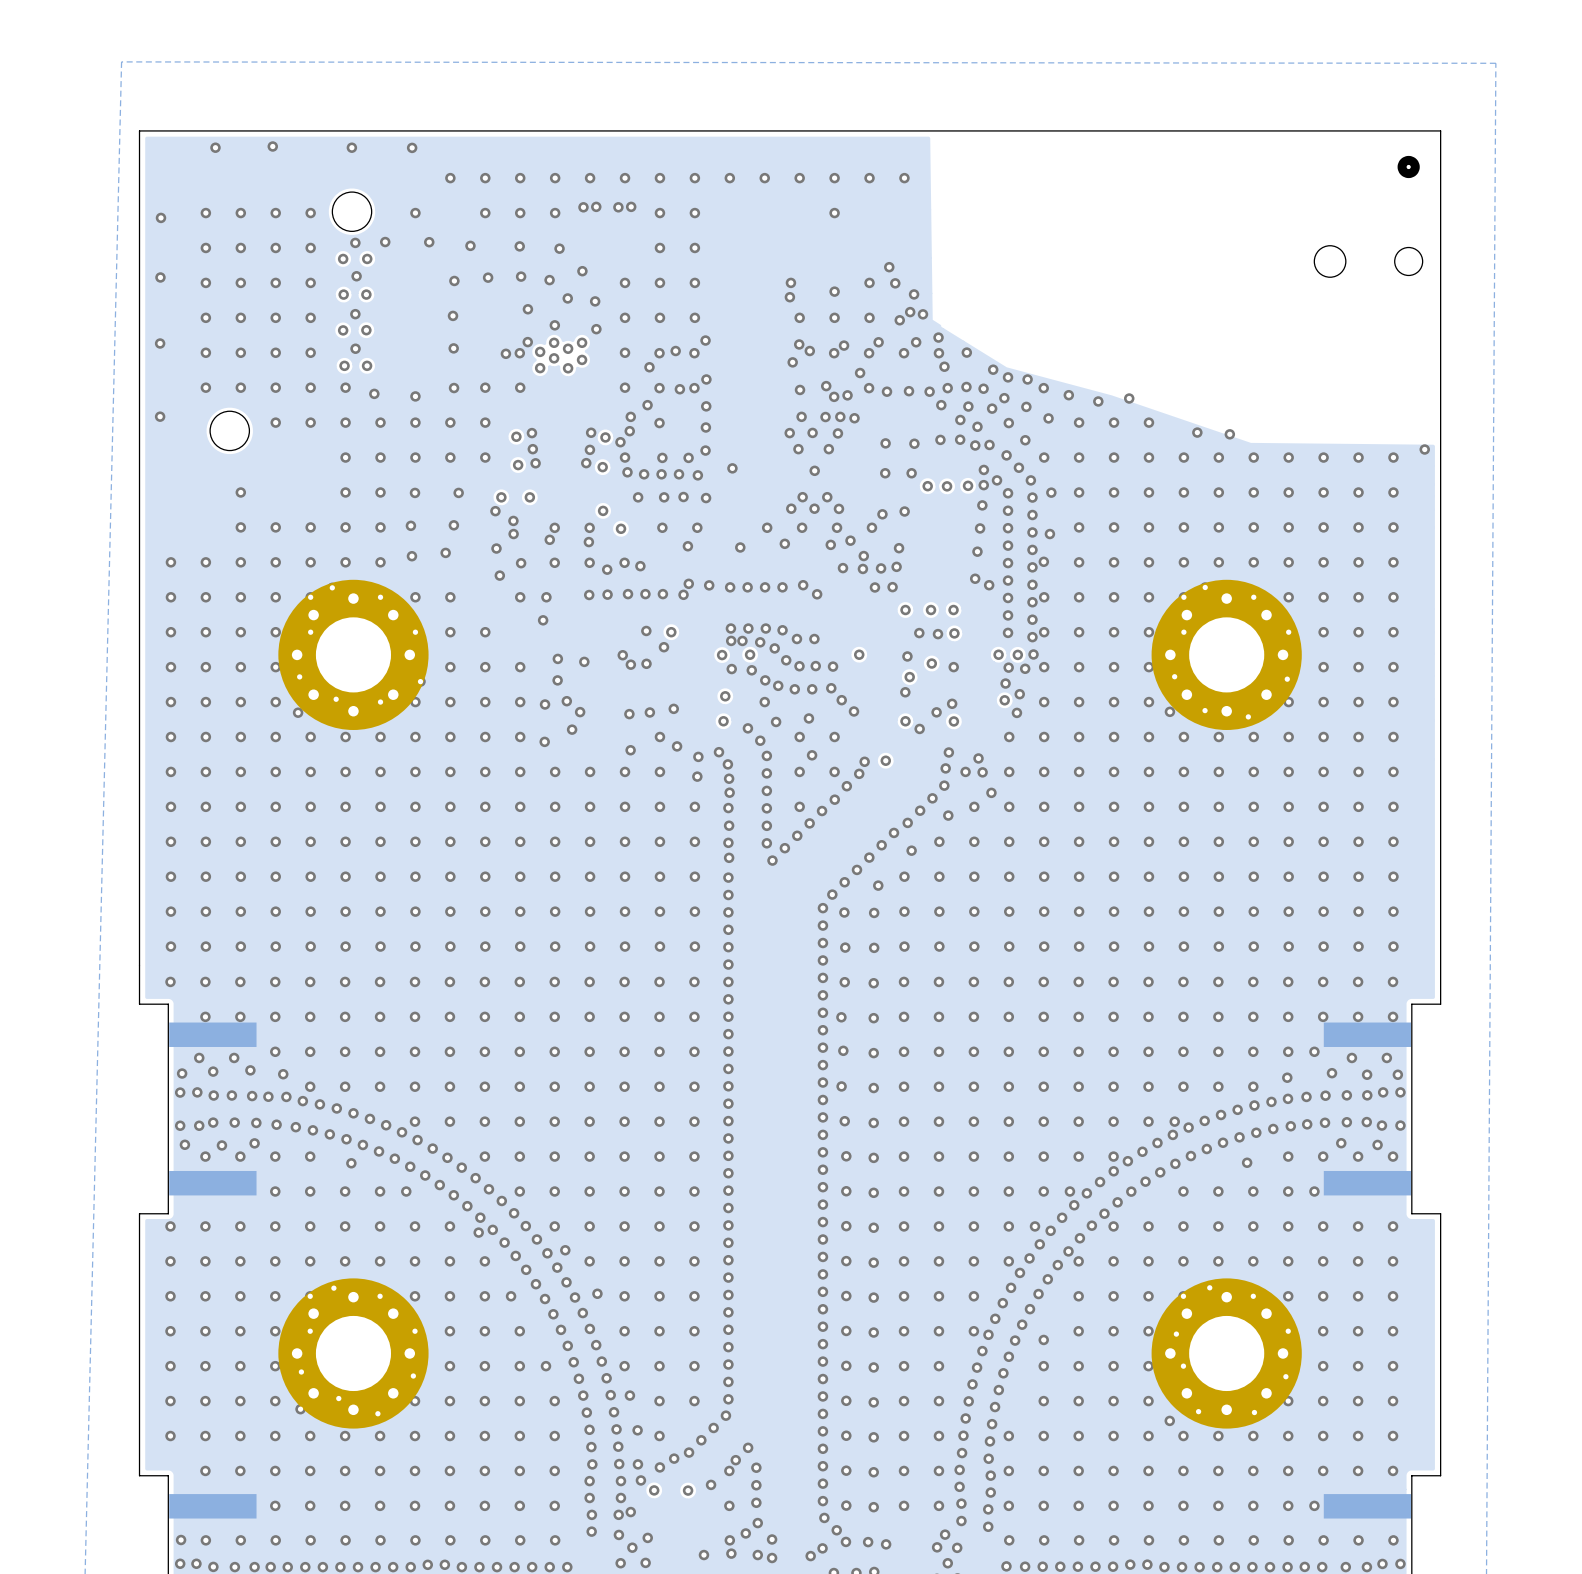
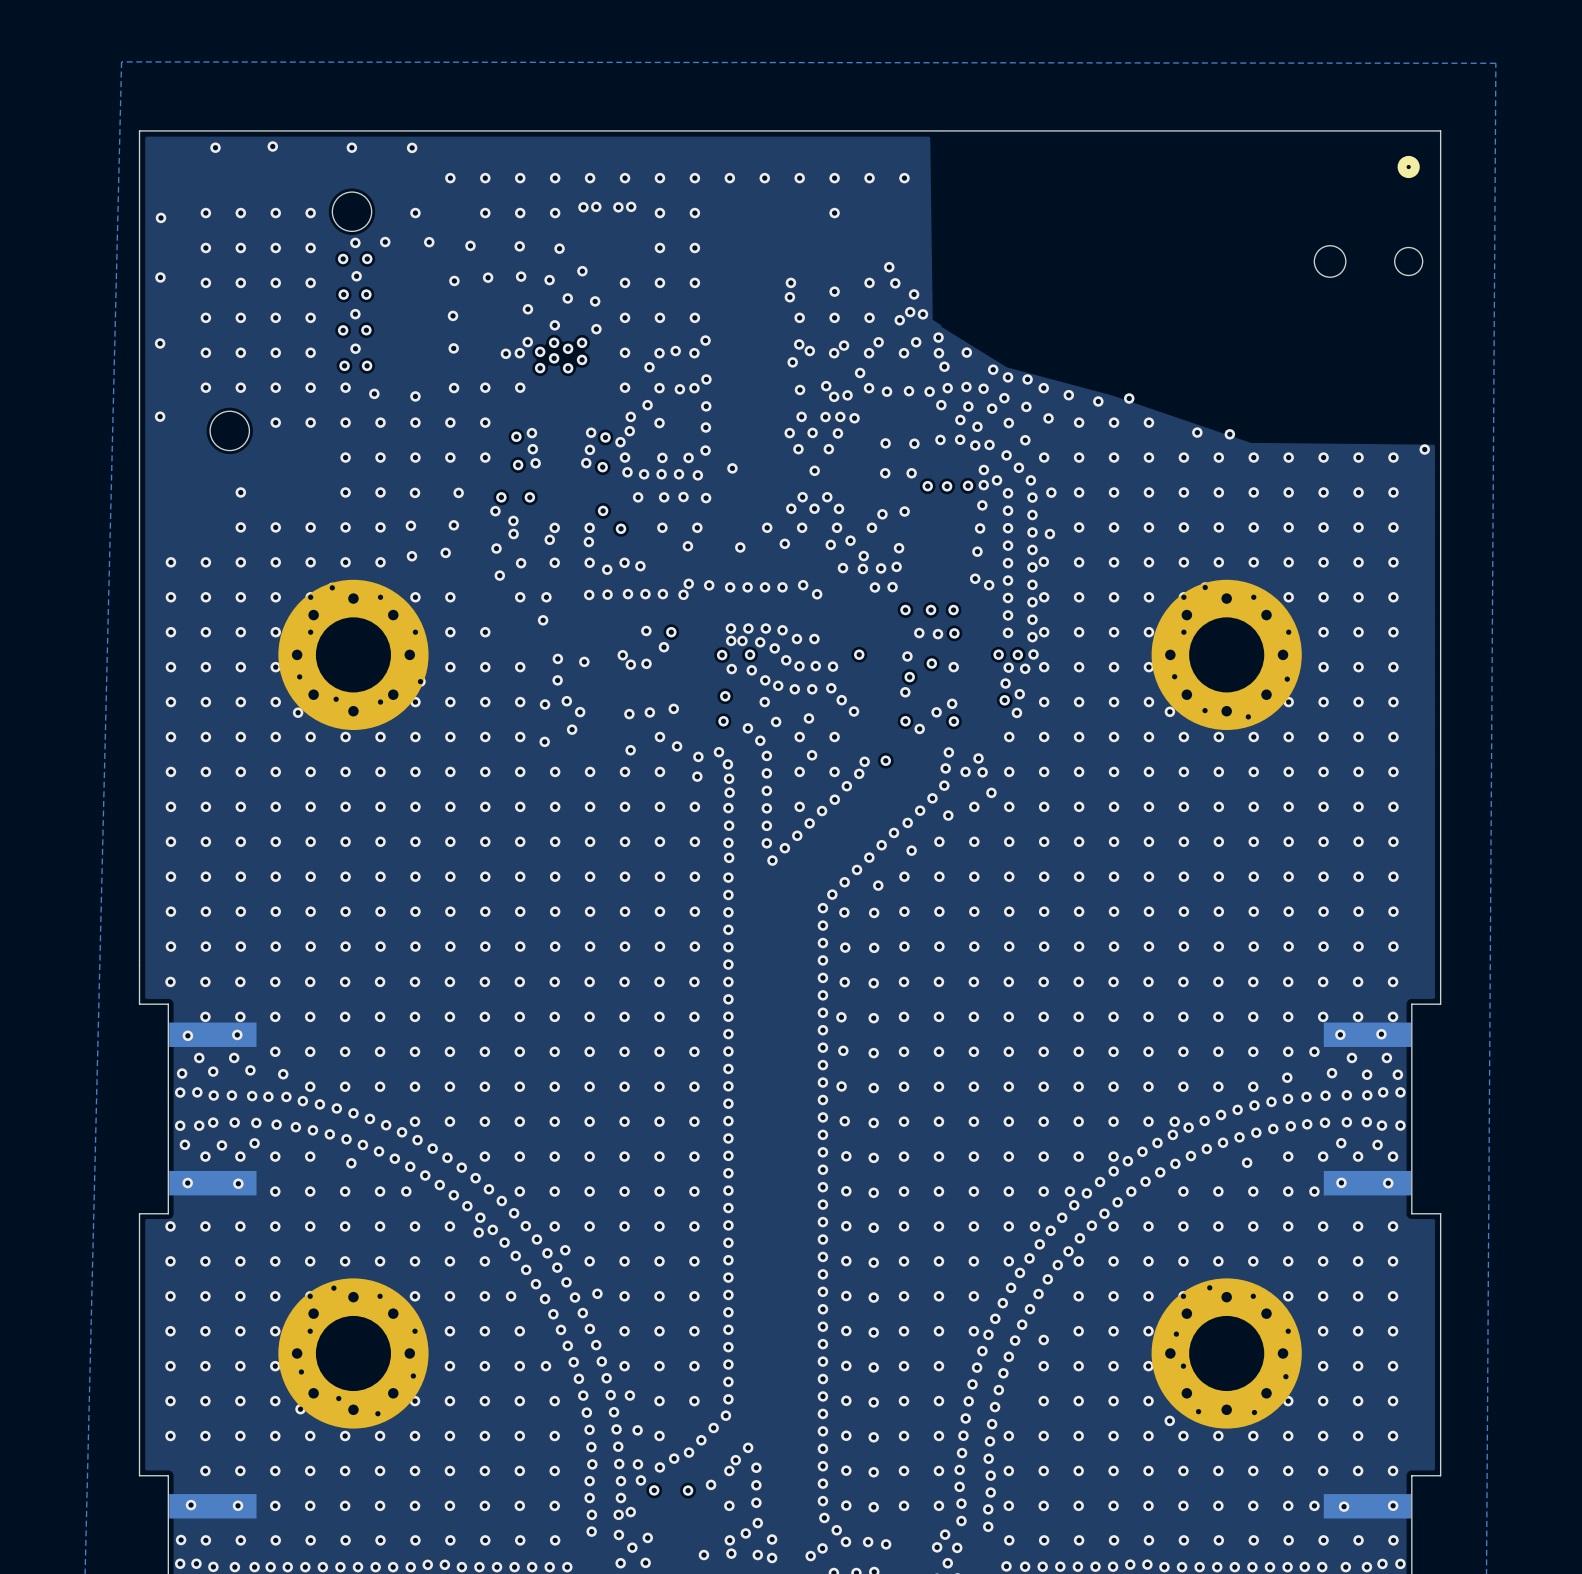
via: none -> (237, 1034)
via: none -> (1340, 1034)
via: none -> (1381, 1034)
via: none -> (187, 1035)
via: none -> (1341, 1182)
via: none -> (187, 1183)
via: none -> (238, 1183)
via: none -> (1388, 1183)
via: none -> (191, 1505)
via: none -> (238, 1505)
via: none -> (1393, 1505)
via: none -> (1344, 1506)

